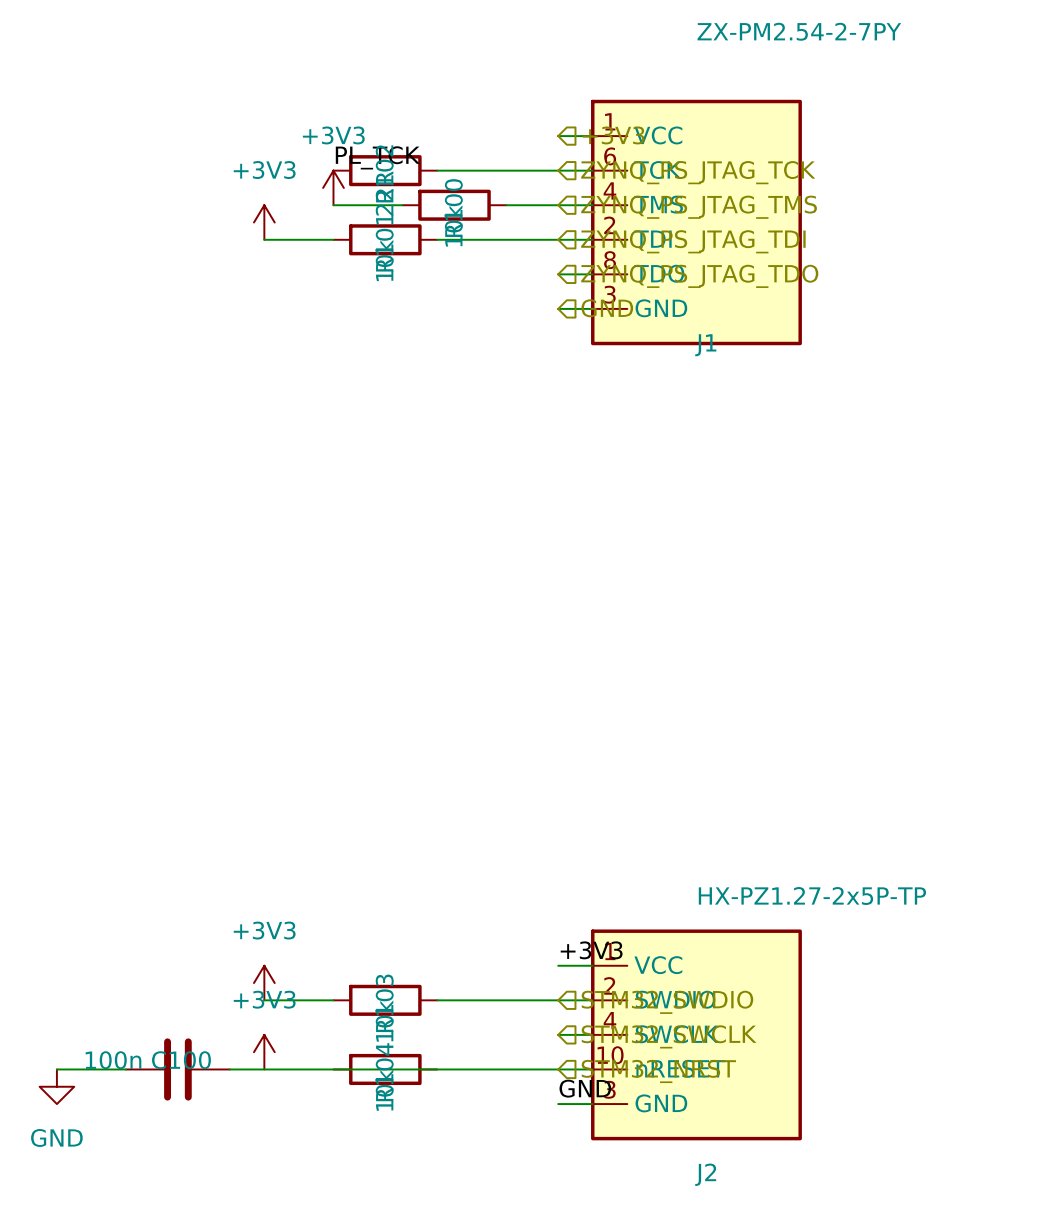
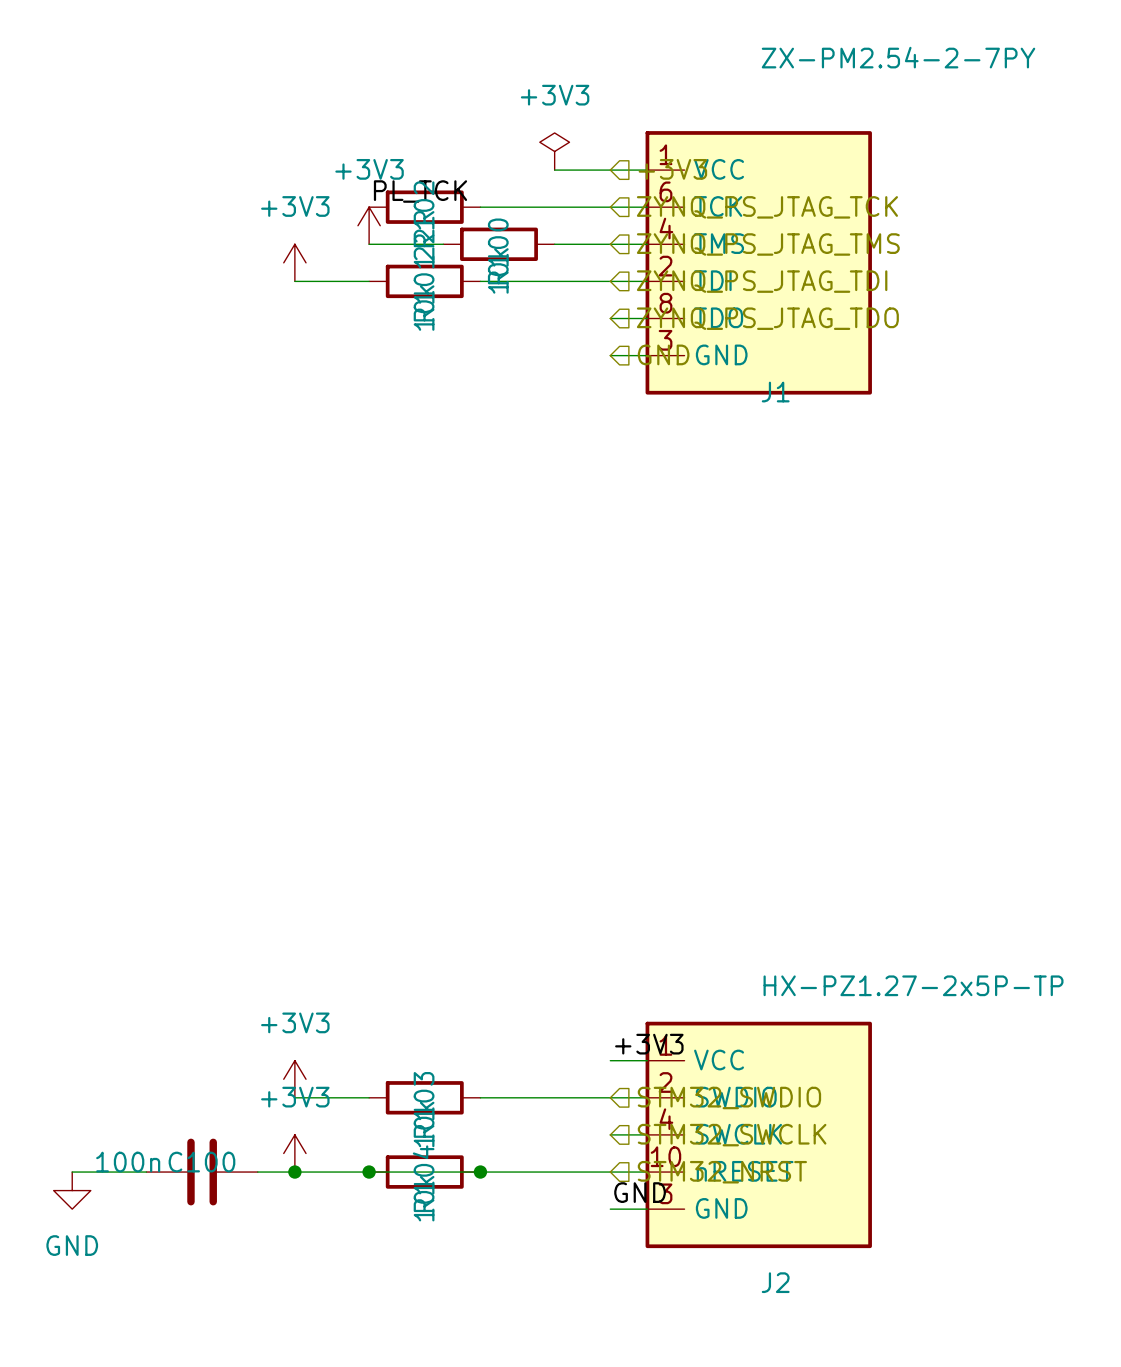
power symbol: none -> +3V3 (554, 151)
wire: none -> (554, 170) (610, 170)
junction: none -> (294, 1172)
junction: none -> (369, 1172)
junction: none -> (480, 1172)

